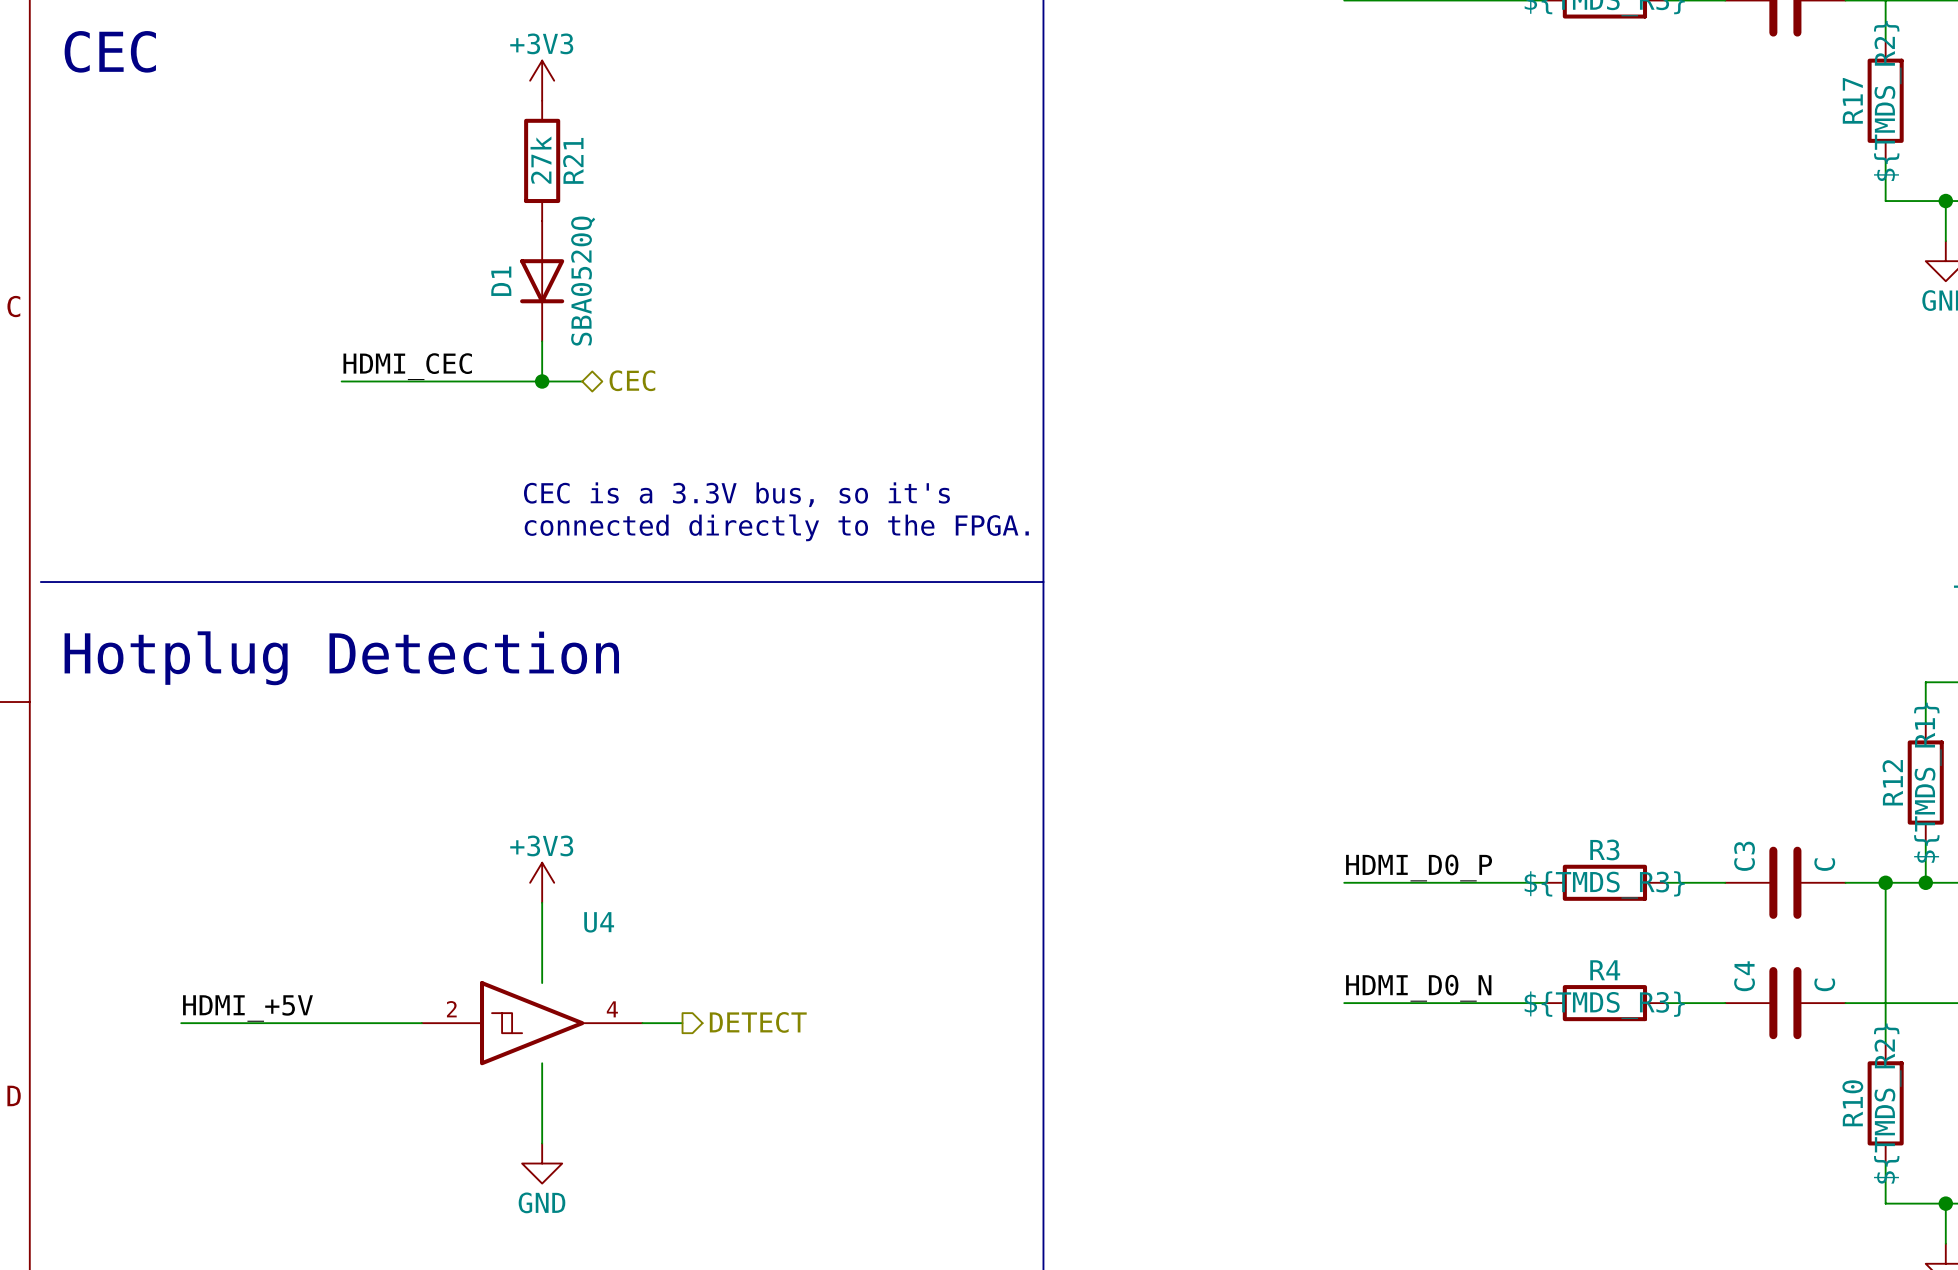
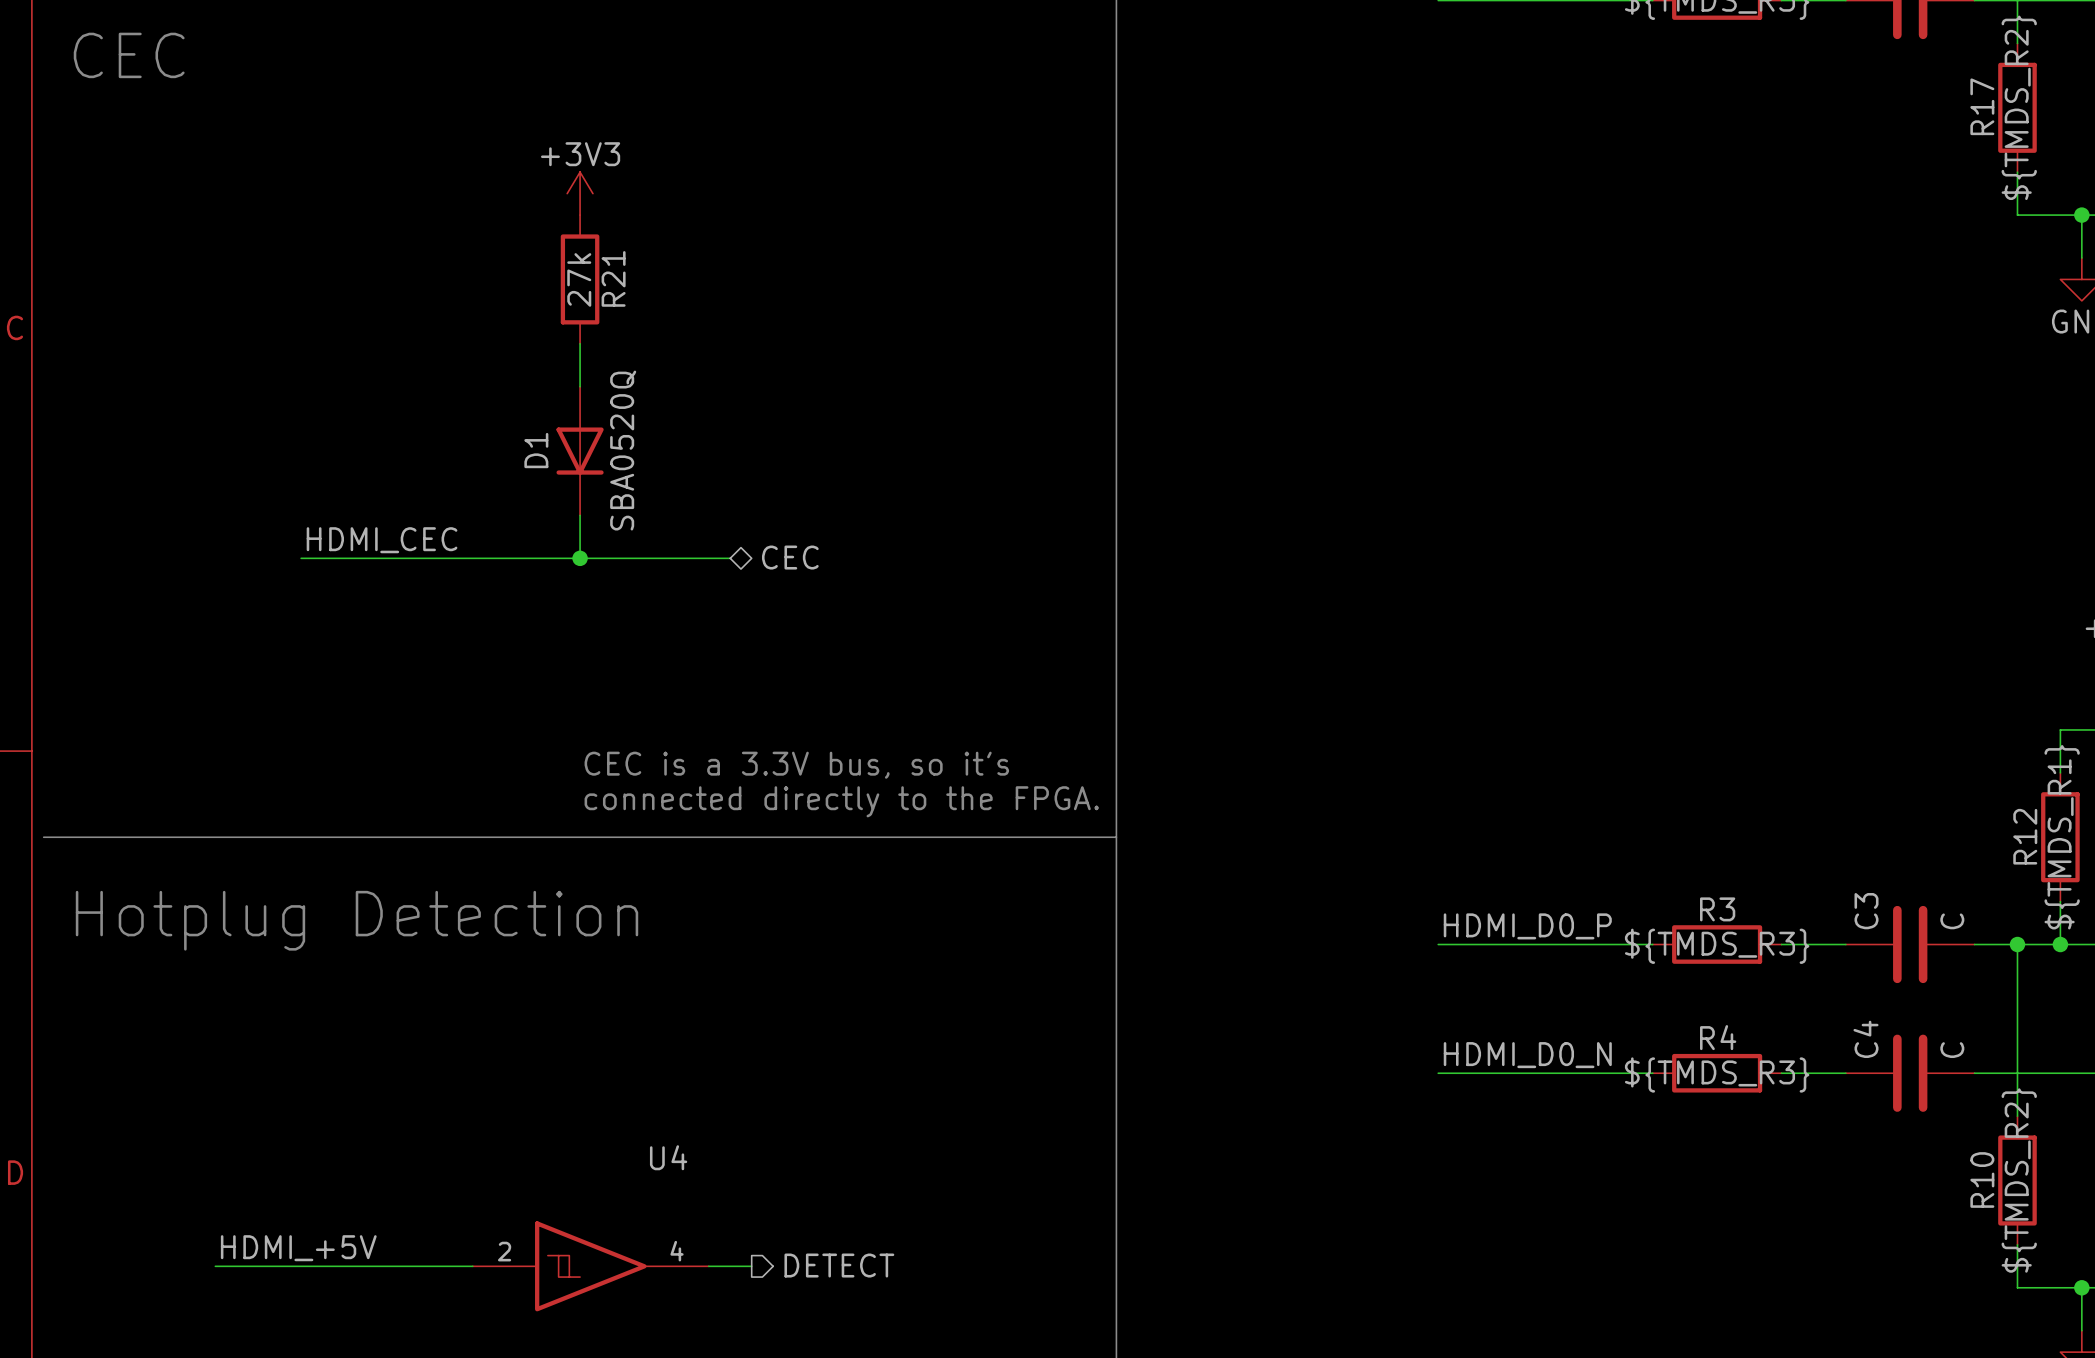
power symbol position: +3V3 (542, 80) -> +3V3 (580, 193)
R21 position: (542, 160) -> (580, 279)
D1 position: (542, 281) -> (580, 451)
label position: HDMI_CEC (407, 366) -> HDMI_CEC (382, 540)
hierarchical label position: CEC (632, 380) -> CEC (790, 557)
wire: (341, 381) (582, 381) -> none
junction: (542, 381) -> none
wire: none -> (580, 515) (580, 558)
text position: CEC is a 3.3V bus, so it's (736, 494) -> CEC is a 3.3V bus, so it's (796, 765)
wire: none -> (301, 558) (730, 558)
junction: none -> (580, 558)
text position: connected directly to the FPGA. (776, 527) -> connected directly to the FPGA. (841, 801)
line: (40, 582) (1043, 582) -> (43, 837) (1116, 837)
text position: Hotplug Detection (341, 658) -> Hotplug Detection (357, 920)
power symbol: +3V3 (542, 882) -> none
wire: (542, 902) (542, 983) -> none
label position: HDMI_+5V (247, 1008) -> HDMI_+5V (298, 1248)
hierarchical label position: DETECT (758, 1022) -> DETECT (839, 1265)
wire: (181, 1023) (421, 1023) -> (215, 1266) (472, 1266)
U4 position: (532, 1023) -> (590, 1266)
wire: (642, 1023) (682, 1023) -> (708, 1266) (751, 1266)
wire: (542, 1063) (542, 1143) -> none
power symbol: GND (542, 1163) -> none

